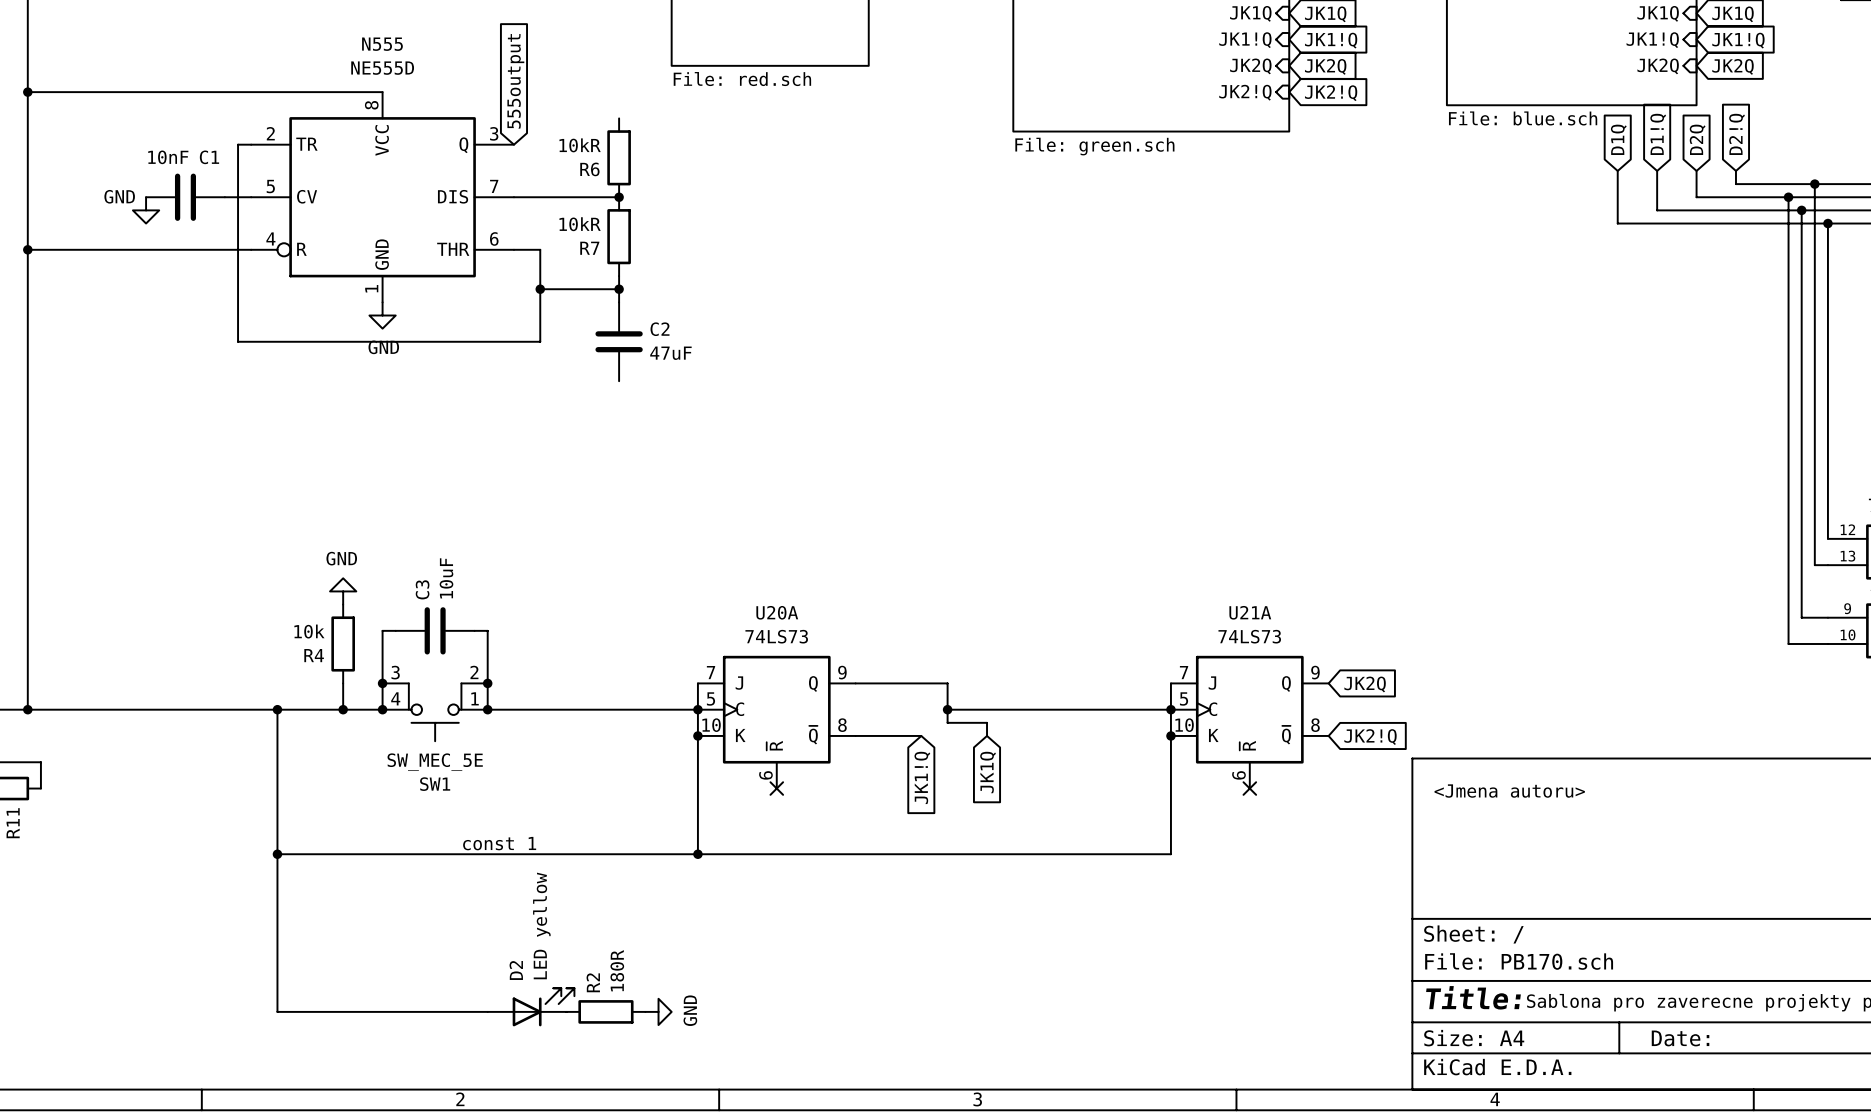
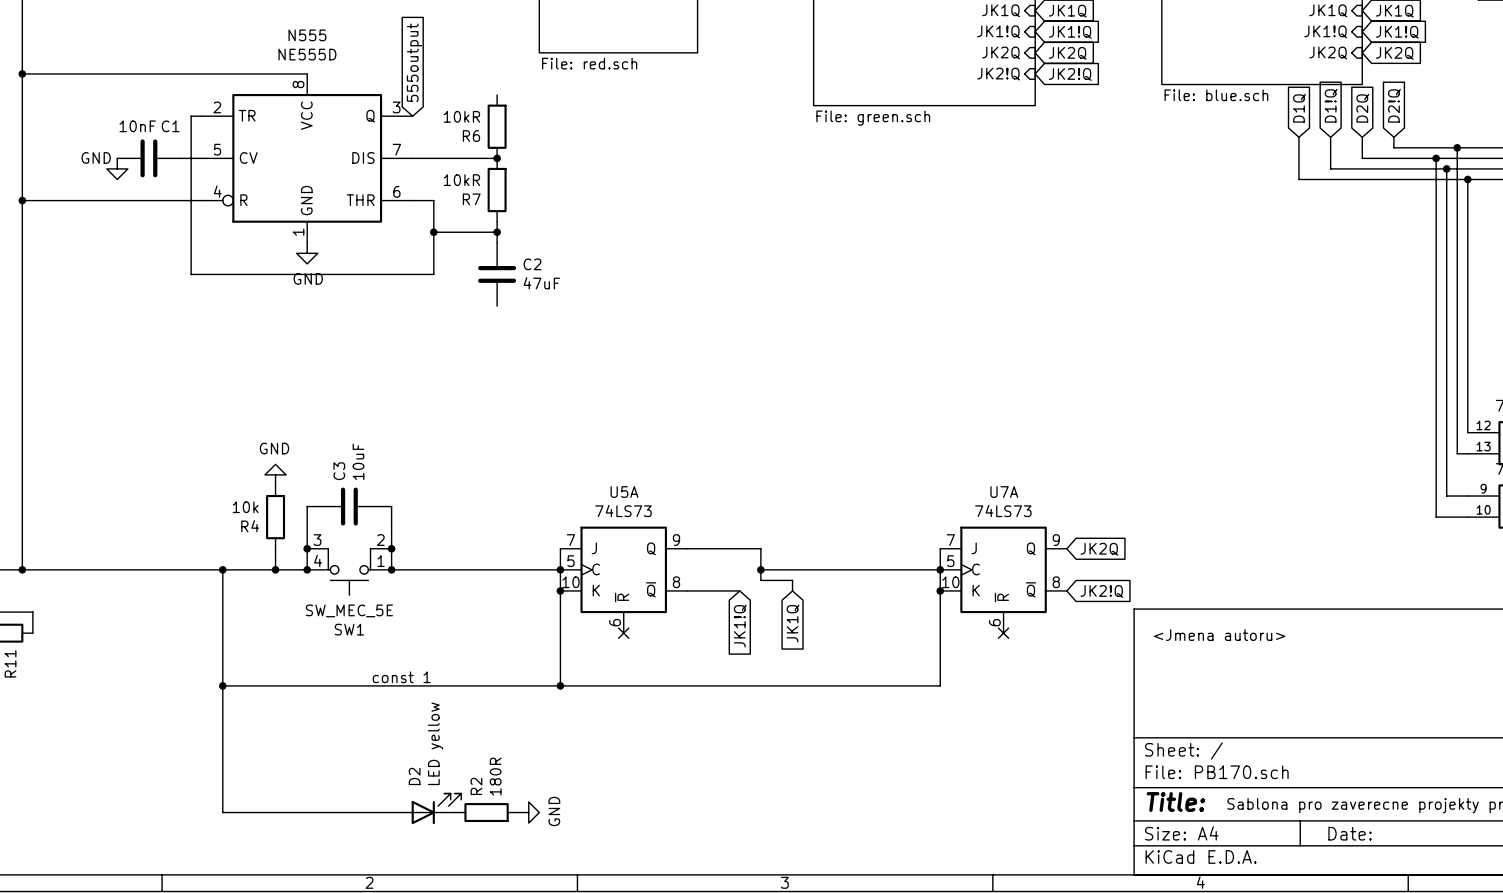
U20A name: U20A (777, 612) -> U5A (624, 492)
U21A name: U21A (1250, 612) -> U7A (1004, 492)

